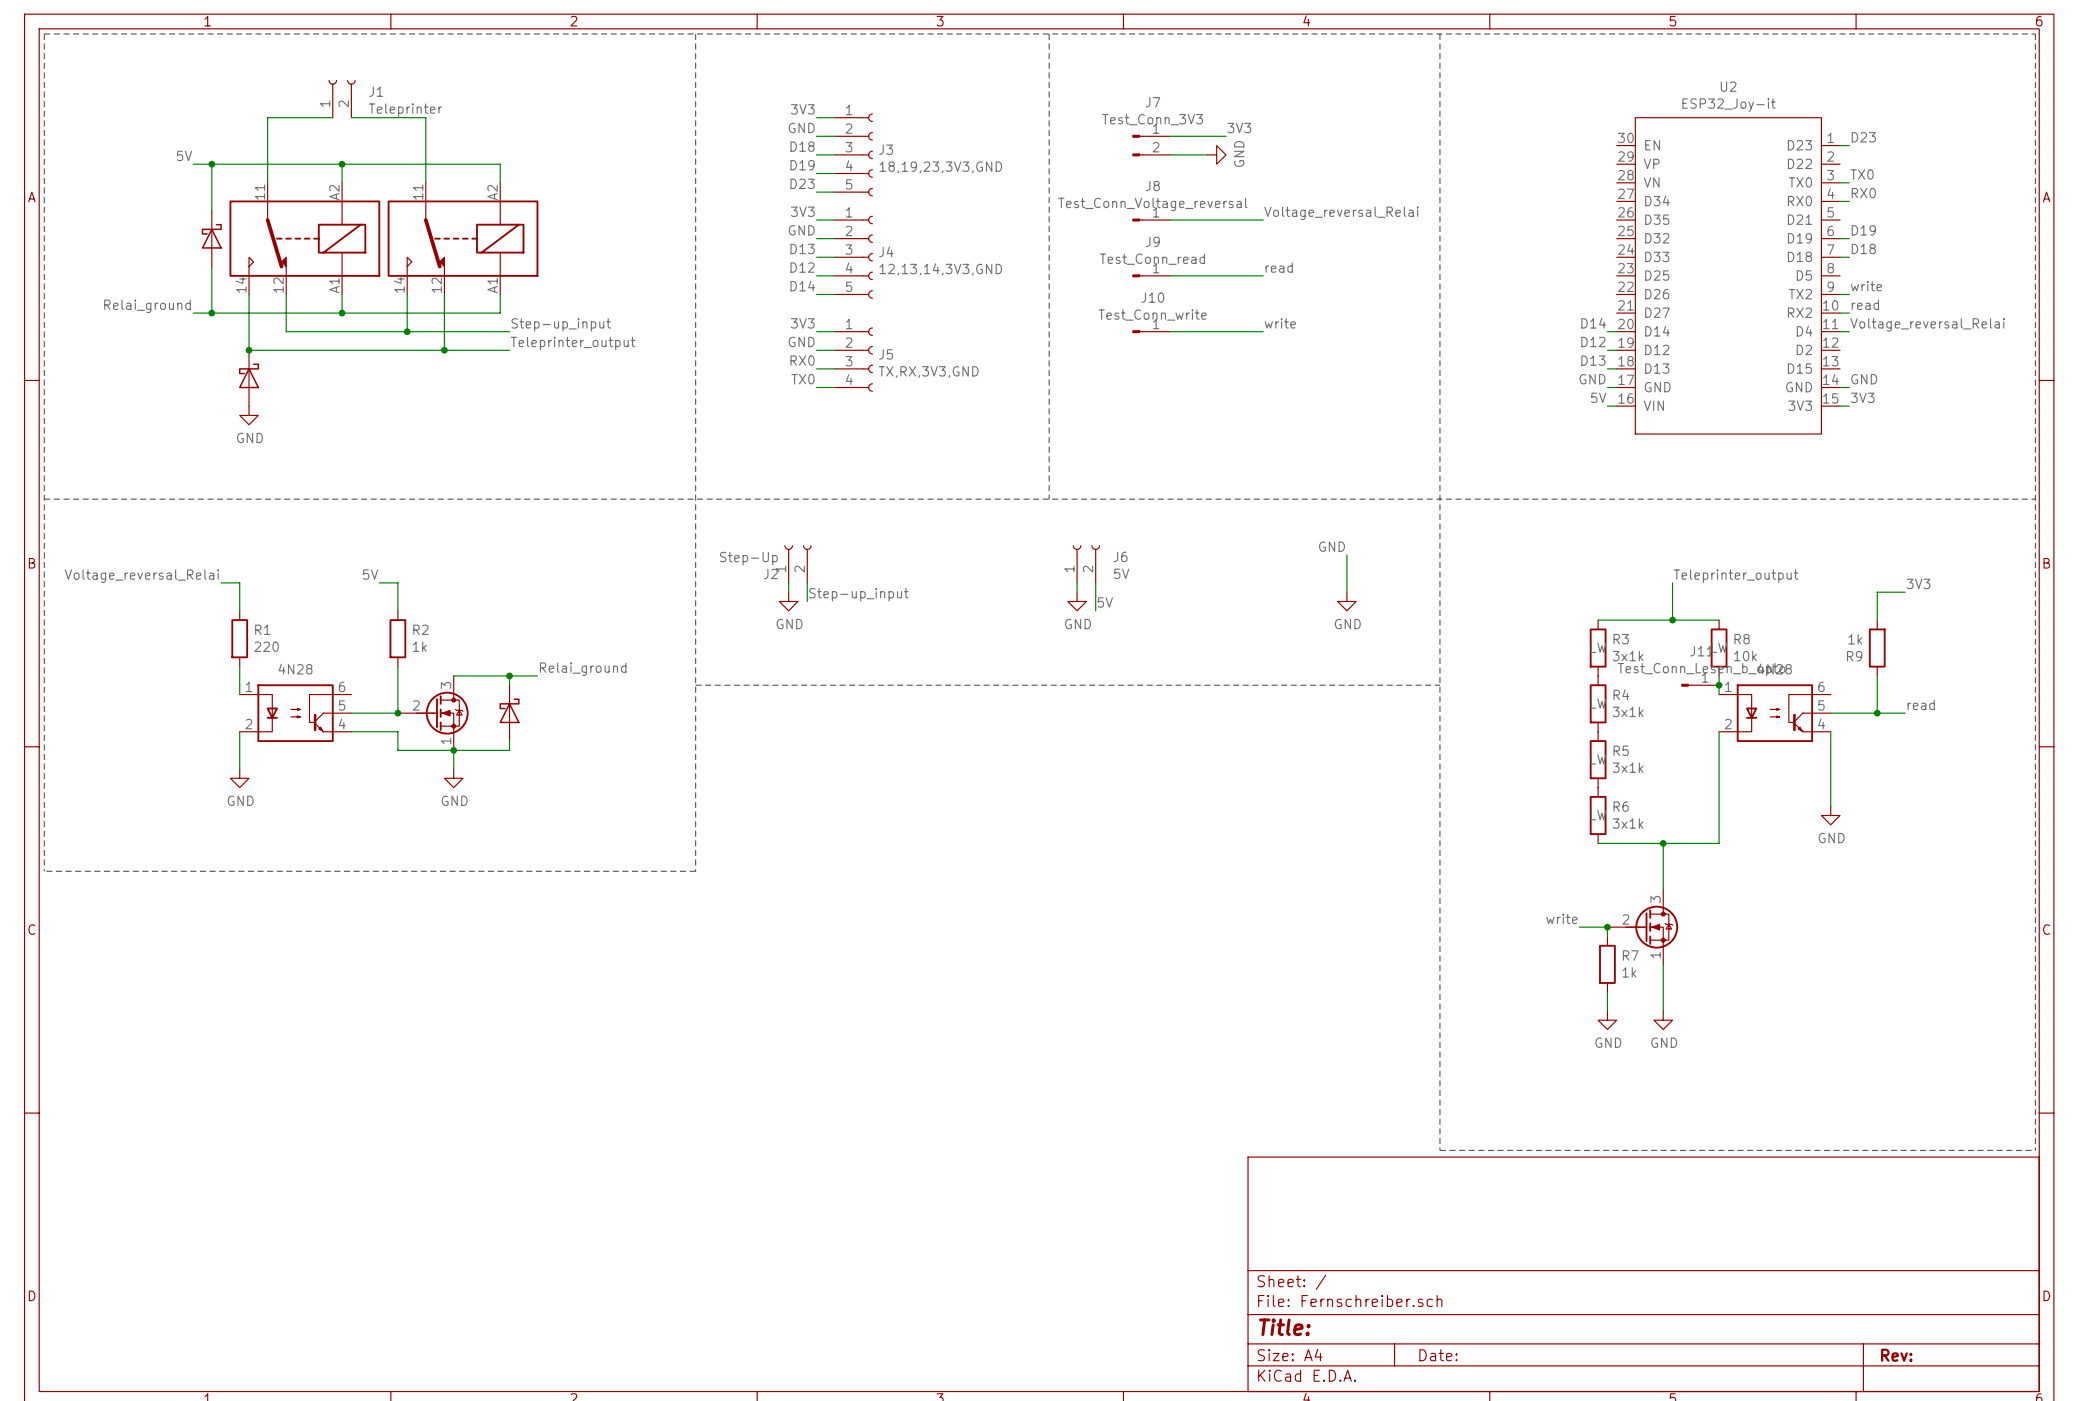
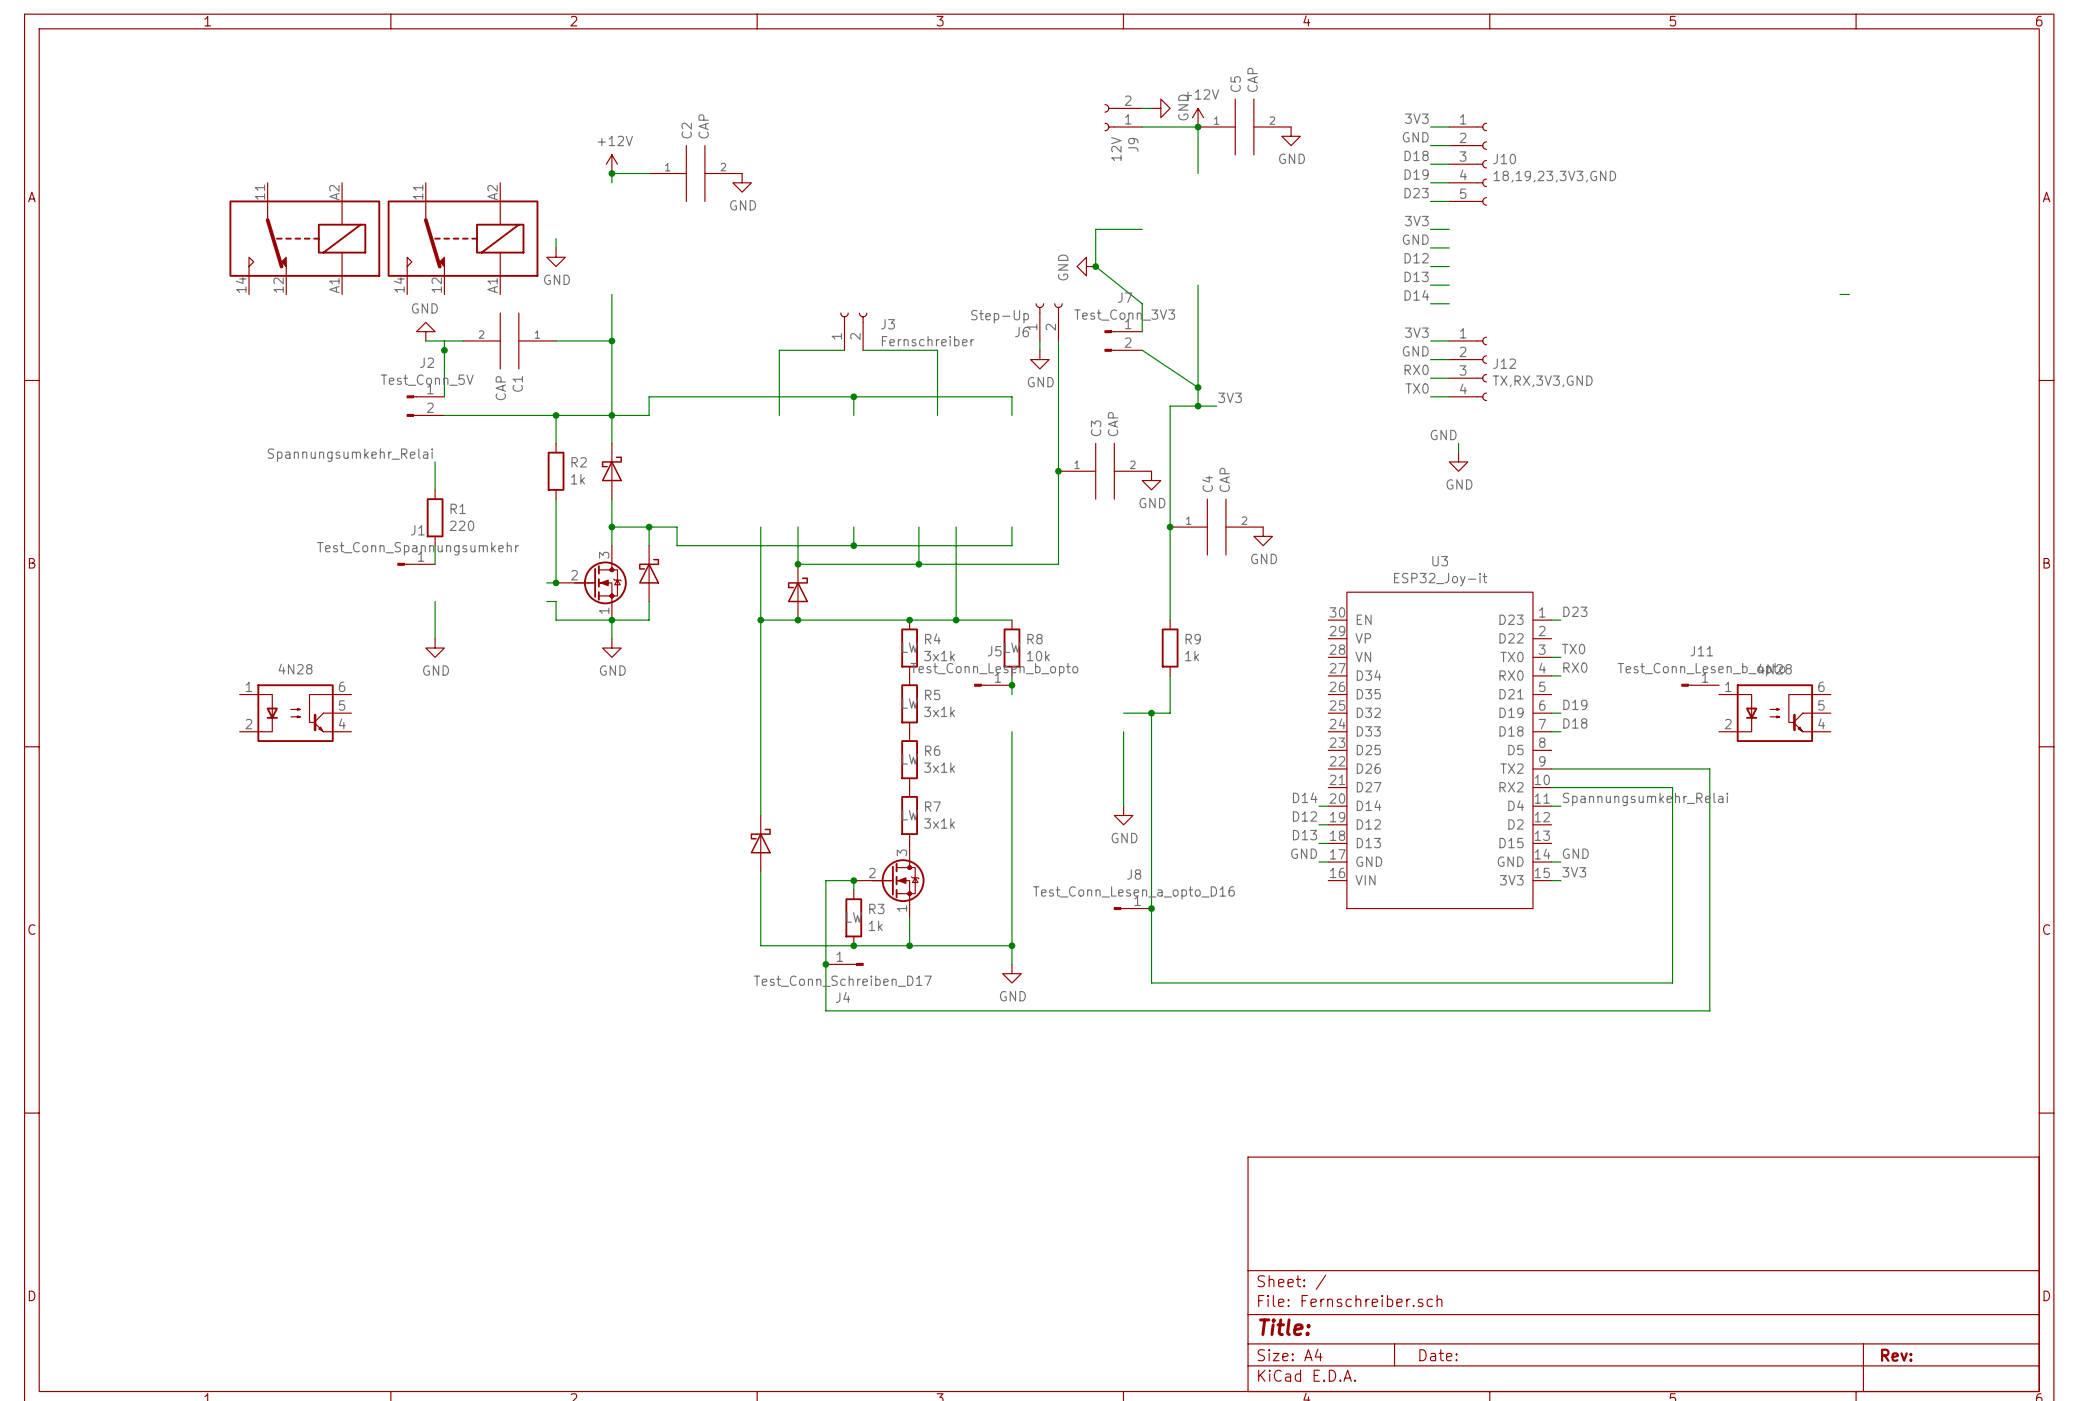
line: (695, 33) (695, 871) (44, 871) (44, 33) (2035, 33) (2035, 1150) (1439, 1150) (1439, 33) -> none
line: (1049, 33) (1049, 499) -> none
J1 symbol: [328, 79, 356, 118] -> [397, 562, 436, 566]
J1 name position: J1 (376, 91) -> J1 (417, 530)
wire: none -> (1142, 108) (1151, 108)
power symbol: none -> GND (1160, 108)
label: 3V3 (802, 109) -> none
J1 value: Teleprinter (405, 110) -> Test_Conn_Spannungsumkehr (417, 548)
J3 symbol: [835, 113, 873, 197] -> [840, 312, 868, 351]
wire: (332, 117) (267, 117) (267, 182) -> none
wire: (351, 117) (425, 117) (425, 182) -> none
wire: (816, 117) (835, 117) -> none
power symbol: none -> +12V (1198, 117)
label: none -> 3V3 (1416, 118)
wire: none -> (1142, 126) (1198, 126) (1198, 173)
junction: none -> (1198, 126)
C5: none -> CAP (1244, 126)
wire: none -> (1430, 126) (1449, 126)
label: GND (801, 127) -> none
label: 3V3 (1239, 127) -> none
wire: (816, 136) (835, 136) -> none
wire: (1170, 136) (1225, 136) -> none
power symbol: none -> GND (1291, 136)
label: none -> GND (1415, 137)
label: D23 (1863, 137) -> none
J7 position: (1151, 145) -> (1123, 340)
wire: none -> (1430, 145) (1449, 145)
wire: (1840, 145) (1849, 145) -> none
label: D18 (802, 146) -> none
wire: (816, 154) (835, 154) -> none
wire: (1170, 154) (1207, 154) -> none
power symbol: GND (1216, 154) -> none
label: 5V (184, 155) -> none
label: none -> D18 (1416, 155)
wire: (193, 164) (500, 164) (500, 182) -> none
wire: (211, 164) (211, 210) -> none
junction: (211, 164) -> none
wire: (342, 164) (342, 182) -> none
junction: (342, 164) -> none
power symbol: none -> +12V (611, 164)
wire: none -> (1430, 164) (1449, 164)
label: D19 (802, 165) -> none
J3 value: 18,19,23,3V3,GND (940, 167) -> Fernschreiber (928, 341)
junction: none -> (611, 173)
wire: none -> (649, 173) (611, 173) (611, 182)
C2: none -> CAP (695, 173)
wire: (816, 173) (835, 173) -> none
label: none -> D19 (1416, 174)
label: TX0 (1862, 174) -> none
power symbol: none -> GND (742, 182)
wire: none -> (1430, 182) (1449, 182)
wire: (1840, 182) (1849, 182) -> none
label: D23 (802, 183) -> none
wire: (816, 192) (835, 192) -> none
label: none -> D23 (1416, 193)
label: RX0 (1863, 193) -> none
wire: none -> (1430, 201) (1449, 201)
wire: (1840, 201) (1849, 201) -> none
J8 value: Test_Conn_Voltage_reversal (1152, 204) -> Test_Conn_Lesen_a_opto_D16 (1133, 893)
label: 3V3 (802, 211) -> none
label: Voltage_reversal_Relai (1341, 213) -> none
J4 symbol: [835, 215, 873, 299] -> [825, 962, 864, 966]
wire: (816, 220) (835, 220) -> none
J8 position: (1151, 220) -> (1132, 908)
wire: (1170, 220) (1263, 220) -> none
label: none -> 3V3 (1416, 221)
wire: none -> (1142, 229) (1095, 229) (1095, 266) (1142, 303) (1142, 331)
wire: none -> (1430, 229) (1449, 229)
label: GND (801, 230) -> none
label: D19 (1863, 230) -> none
part: (211, 238) -> none
wire: none -> (556, 238) (556, 247)
wire: (816, 238) (835, 238) -> none
wire: (1840, 238) (1849, 238) -> none
label: none -> GND (1415, 239)
J9 name position: J9 (1152, 241) -> J9 (1133, 144)
wire: none -> (1430, 247) (1449, 247)
label: D13 (802, 248) -> none
label: D18 (1863, 248) -> none
J4 name position: J4 (886, 251) -> J4 (843, 997)
power symbol: none -> GND (556, 257)
wire: (816, 257) (835, 257) -> none
wire: (1840, 257) (1849, 257) -> none
label: none -> D12 (1416, 258)
J9 value: Test_Conn_read (1152, 259) -> 12V (1116, 149)
wire: (211, 266) (211, 313) -> none
power symbol: none -> GND (1086, 266)
junction: none -> (1095, 266)
wire: none -> (1430, 266) (1449, 266)
label: D12 (802, 267) -> none
label: read (1279, 267) -> none
J4 value: 12,13,14,3V3,GND (940, 269) -> Test_Conn_Schreiben_D17 (842, 981)
J9 symbol: [1132, 274, 1171, 278] -> [1104, 104, 1143, 132]
wire: (816, 275) (835, 275) -> none
wire: (1170, 275) (1263, 275) -> none
U2: ESP32_Joy-it (1728, 275) -> none
label: none -> D13 (1416, 276)
label: D14 (802, 285) -> none
wire: none -> (1198, 285) (1198, 406)
wire: none -> (1430, 285) (1449, 285)
label: write (1866, 286) -> none
wire: (249, 294) (249, 350) (509, 350) -> none
wire: (286, 294) (286, 331) (509, 331) -> none
wire: (342, 294) (342, 313) -> none
wire: (407, 294) (407, 331) -> none
wire: (444, 294) (444, 340) -> (444, 350) (444, 396)
wire: (500, 294) (500, 313) (193, 313) -> none
wire: none -> (611, 294) (611, 443)
wire: (816, 294) (835, 294) -> none
J10 name position: J10 (1152, 297) -> J10 (1504, 159)
wire: none -> (1430, 303) (1449, 303)
label: read (1865, 304) -> none
label: Relai_ground (147, 306) -> none
junction: (211, 313) -> none
junction: (342, 313) -> none
wire: (1840, 313) (1849, 313) -> none
J10 value: Test_Conn_write (1152, 315) -> 18,19,23,3V3,GND (1554, 176)
label: 3V3 (802, 323) -> none
label: write (1280, 323) -> none
label position: D14 (1593, 323) -> D14 (1416, 295)
label: Step-up_input (561, 324) -> none
label: Voltage_reversal_Relai (1927, 324) -> none
J5 symbol: [835, 327, 873, 392] -> [974, 683, 1012, 687]
J10 symbol: [1132, 330, 1171, 334] -> [1449, 122, 1488, 206]
junction: (407, 331) -> none
power symbol: none -> GND (425, 331)
wire: (816, 331) (835, 331) -> none
wire: (1170, 331) (1263, 331) -> none
wire: (1607, 331) (1616, 331) -> none
wire: (1840, 331) (1849, 331) -> none
label: none -> 3V3 (1416, 332)
wire: none -> (425, 340) (463, 340)
C1: none -> CAP (509, 340)
wire: none -> (556, 340) (611, 340)
junction: none -> (611, 340)
wire: none -> (1039, 340) (1039, 350)
wire: none -> (1058, 340) (1058, 564) (797, 564) (797, 527)
wire: none -> (1430, 340) (1449, 340)
label: GND (801, 341) -> none
label: D12 (1593, 341) -> none
label: Teleprinter_output (572, 343) -> none
junction: (249, 350) -> none
wire: none -> (816, 350) (779, 350) (779, 415)
wire: none -> (863, 350) (937, 350) (937, 415)
wire: none -> (1142, 350) (1198, 387)
wire: (1607, 350) (1616, 350) -> none
label: none -> GND (1415, 351)
J5 name position: J5 (886, 354) -> J5 (994, 651)
power symbol: none -> GND (1039, 359)
wire: none -> (1430, 359) (1449, 359)
label: RX0 (802, 360) -> none
label: D13 (1593, 360) -> none
wire: (816, 368) (835, 368) -> none
J12: none -> TX,RX,3V3,GND (1468, 368)
wire: (1607, 368) (1616, 368) -> none
label: none -> RX0 (1416, 369)
J5 value: TX,RX,3V3,GND (928, 372) -> Test_Conn_Lesen_b_opto (994, 669)
part: (249, 378) -> none
wire: none -> (1430, 378) (1449, 378)
label: TX0 (802, 379) -> none
label: GND (1592, 379) -> none
label: GND (1864, 379) -> none
wire: (816, 387) (835, 387) -> none
junction: none -> (1198, 387)
wire: (1607, 387) (1616, 387) -> none
wire: (1840, 387) (1849, 387) -> none
label: none -> TX0 (1417, 388)
wire: none -> (853, 396) (853, 415)
junction: none -> (853, 396)
wire: none -> (1430, 396) (1449, 396)
label: none -> 3V3 (1230, 397)
label: 5V (1598, 397) -> none
label: 3V3 (1862, 397) -> none
junction: none -> (1198, 406)
wire: none -> (1216, 406) (1170, 406) (1170, 620)
wire: (1607, 406) (1616, 406) -> none
wire: (1840, 406) (1849, 406) -> none
power symbol: GND (249, 415) -> none
wire: none -> (444, 415) (649, 415) (649, 396) (1011, 396) (1011, 415)
wire: none -> (556, 415) (556, 443)
junction: none -> (556, 415)
junction: none -> (611, 415)
label: none -> GND (1443, 435)
wire: none -> (1458, 443) (1458, 452)
label: none -> Spannungsumkehr_Relai (350, 455)
wire: none -> (435, 461) (435, 489)
power symbol: none -> GND (1458, 461)
part: none -> (611, 471)
junction: none -> (1058, 471)
C3: none -> CAP (1105, 471)
power symbol: none -> GND (1151, 480)
line: (44, 499) (2035, 499) -> none
wire: none -> (556, 499) (556, 582) (546, 582)
wire: none -> (611, 499) (611, 545)
wire: none -> (611, 527) (677, 527) (677, 545) (1011, 545) (1011, 527)
junction: none -> (611, 527)
wire: none -> (649, 527) (649, 545)
junction: none -> (649, 527)
wire: none -> (760, 527) (760, 815)
wire: none -> (918, 527) (918, 564)
wire: none -> (956, 527) (956, 620)
junction: none -> (1170, 527)
C4: none -> CAP (1216, 527)
power symbol: none -> GND (1263, 536)
wire: none -> (435, 545) (435, 564)
J2 symbol: [784, 545, 812, 583] -> [406, 395, 445, 417]
junction: none -> (853, 545)
label: GND (1332, 546) -> none
wire: (1346, 554) (1346, 592) -> none
J6 name position: J6 (1120, 556) -> J6 (1022, 332)
J2 value: Step-Up (748, 558) -> Test_Conn_5V (427, 380)
junction: none -> (797, 564)
junction: none -> (918, 564)
J6 position: (1086, 564) -> (1049, 322)
part: none -> (649, 573)
J2 name position: J2 (770, 573) -> J2 (427, 362)
J6 value: 5V (1121, 573) -> Step-Up (1000, 316)
label: 5V (370, 574) -> none
label: Voltage_reversal_Relai (141, 576) -> none
label: Teleprinter_output (1735, 576) -> none
wire: (221, 582) (239, 582) (239, 610) -> none
wire: (379, 582) (397, 582) (397, 610) -> none
junction: none -> (556, 582)
part: none -> (591, 582)
wire: (807, 582) (807, 601) -> (853, 527) (853, 545)
wire: (1077, 582) (1077, 592) -> none
wire: (1095, 582) (1095, 610) -> none
wire: (1672, 582) (1672, 620) -> none
label: 3V3 (1918, 583) -> none
part: none -> (797, 592)
wire: (1905, 592) (1877, 592) (1877, 620) -> none
label: Step-up_input (858, 594) -> none
wire: none -> (435, 601) (435, 638)
wire: none -> (546, 601) (556, 601) (556, 620) (649, 620) (649, 601)
power symbol: GND (788, 601) -> none
power symbol: GND (1077, 601) -> none
power symbol: GND (1346, 601) -> none
label: 5V (1105, 602) -> none
label: none -> D23 (1575, 611)
wire: none -> (611, 620) (611, 638)
junction: none -> (611, 620)
wire: none -> (760, 620) (1011, 620)
junction: none -> (760, 620)
junction: none -> (797, 620)
junction: none -> (909, 620)
junction: none -> (956, 620)
wire: none -> (1551, 620) (1560, 620)
wire: (1598, 620) (1719, 620) -> none
junction: (1672, 620) -> none
R1 position: (239, 638) -> (435, 517)
R2 position: (397, 638) -> (556, 471)
R9 value position: 1k (1855, 639) -> 1k (1192, 656)
power symbol: none -> GND (435, 648)
power symbol: none -> GND (611, 648)
R3 position: (1598, 648) -> (853, 917)
R8 position: (1719, 648) -> (1011, 648)
R9 position: (1877, 648) -> (1170, 648)
label: none -> TX0 (1573, 649)
R3 value: 3x1k (1628, 656) -> 1k (875, 925)
R9 name position: R9 (1854, 656) -> R9 (1193, 639)
wire: none -> (1551, 657) (1560, 657)
wire: (239, 666) (239, 694) -> none
wire: (397, 666) (397, 713) (351, 713) -> none
label: none -> RX0 (1575, 667)
label: Relai_ground (583, 669) -> none
wire: (453, 675) (537, 675) -> none
wire: (509, 675) (509, 685) -> none
junction: (509, 675) -> none
wire: none -> (1011, 675) (1011, 694)
wire: none -> (1170, 675) (1170, 713) (1123, 713)
wire: none -> (1551, 675) (1560, 675)
wire: (1719, 675) (1719, 694) -> none
wire: (1877, 675) (1877, 713) -> none
line: (695, 685) (1439, 685) -> none
junction: none -> (1011, 685)
junction: (1719, 685) -> none
R4 position: (1598, 703) -> (909, 648)
label: none -> D19 (1575, 704)
label: read (1921, 704) -> none
junction: (397, 713) -> none
part: (433, 713) -> none
part: (509, 713) -> none
wire: none -> (1151, 713) (1151, 982) (1672, 982) (1672, 787) (1551, 787)
junction: none -> (1151, 713)
wire: none -> (1551, 713) (1560, 713)
wire: (1830, 713) (1905, 713) -> none
junction: (1877, 713) -> none
label: none -> D18 (1575, 723)
wire: (239, 731) (239, 768) -> none
wire: (351, 731) (397, 731) (397, 750) (509, 750) (509, 741) -> none
wire: none -> (1011, 731) (1011, 964)
wire: none -> (1123, 731) (1123, 806)
wire: none -> (1551, 731) (1560, 731)
wire: (1719, 731) (1719, 843) (1598, 843) -> none
wire: (1830, 731) (1830, 806) -> none
wire: (453, 750) (453, 768) -> none
junction: (453, 750) -> none
U3: none -> ESP32_Joy-it (1439, 750)
R5 position: (1598, 759) -> (909, 703)
wire: none -> (1551, 768) (1709, 768) (1709, 1010) (825, 1010) (825, 880) (853, 880) (853, 889)
power symbol: GND (239, 778) -> none
power symbol: GND (453, 778) -> none
label: none -> D14 (1305, 797)
label: none -> Spannungsumkehr_Relai (1645, 799)
wire: none -> (1319, 806) (1328, 806)
wire: none -> (1551, 806) (1560, 806)
R7 text: none -> LW (910, 815)
power symbol: none -> GND (1123, 815)
R6 position: (1598, 815) -> (909, 759)
power symbol: GND (1830, 815) -> none
label: none -> D12 (1304, 816)
wire: none -> (1319, 824) (1328, 824)
label: none -> D13 (1304, 835)
part: none -> (760, 843)
wire: none -> (1319, 843) (1328, 843)
wire: (1663, 843) (1663, 889) -> none
junction: (1663, 843) -> none
label: none -> GND (1304, 853)
label: none -> GND (1575, 853)
wire: none -> (1319, 862) (1328, 862)
wire: none -> (1551, 862) (1560, 862)
wire: none -> (760, 871) (760, 945) (1011, 945)
label: none -> 3V3 (1574, 872)
junction: none -> (853, 880)
part: none -> (889, 880)
wire: none -> (1551, 880) (1560, 880)
junction: none -> (1151, 908)
wire: none -> (909, 917) (909, 945)
label: write (1561, 918) -> none
wire: (1579, 927) (1607, 927) (1607, 936) -> none
junction: (1607, 927) -> none
part: (1642, 927) -> none
junction: none -> (853, 945)
junction: none -> (909, 945)
junction: none -> (1011, 945)
junction: none -> (825, 964)
R7 position: (1607, 964) -> (909, 815)
wire: (1663, 964) (1663, 1010) -> none
R7 value: 1k (1629, 972) -> 3x1k (939, 823)
power symbol: none -> GND (1011, 973)
wire: (1607, 992) (1607, 1010) -> none
power symbol: GND (1607, 1020) -> none
power symbol: GND (1663, 1020) -> none

